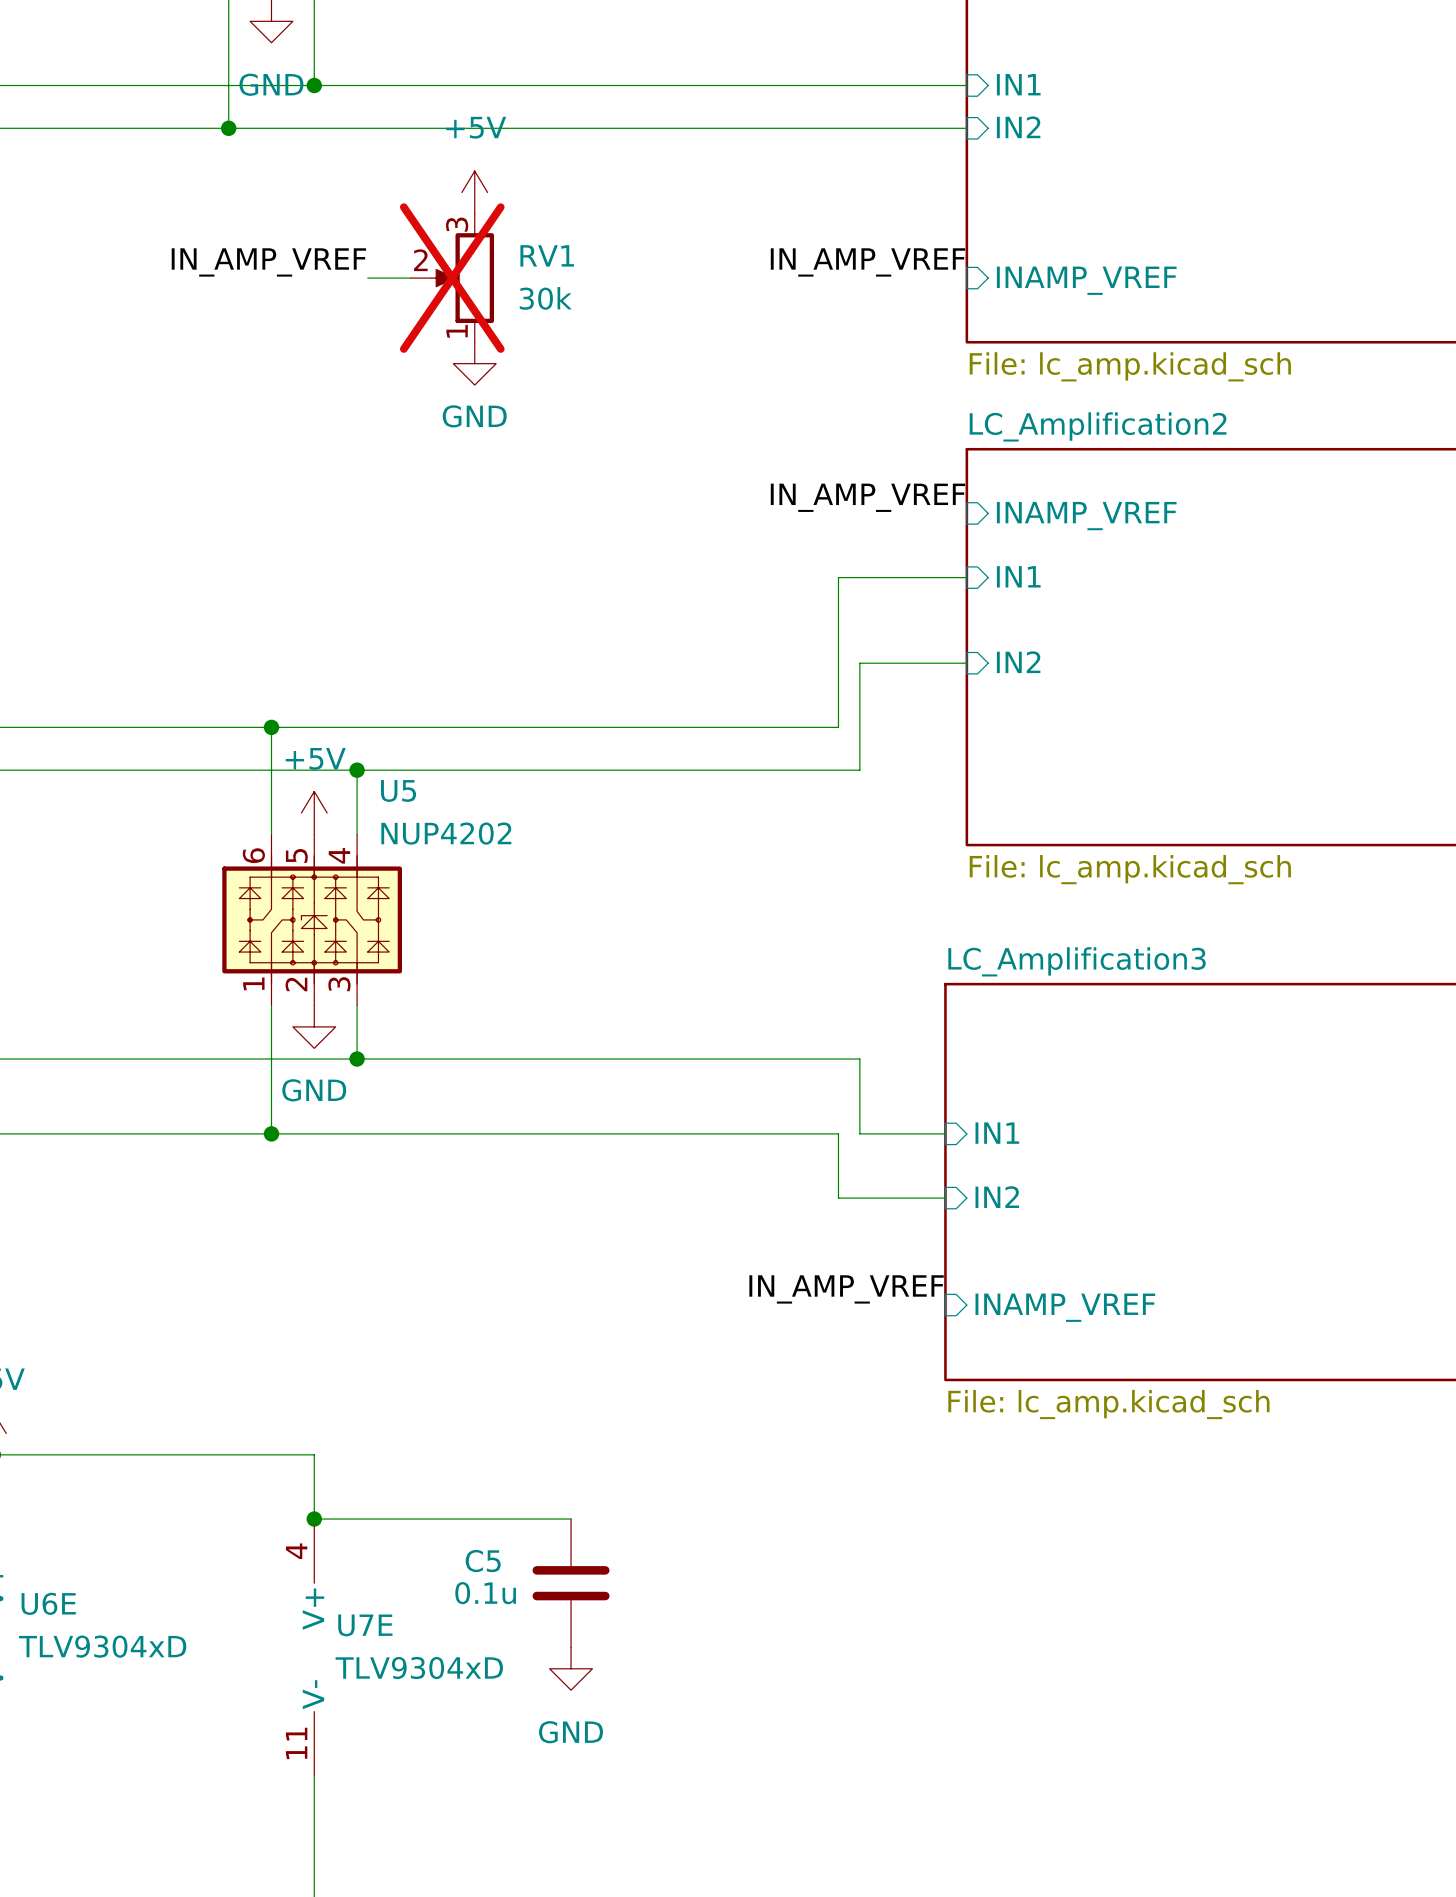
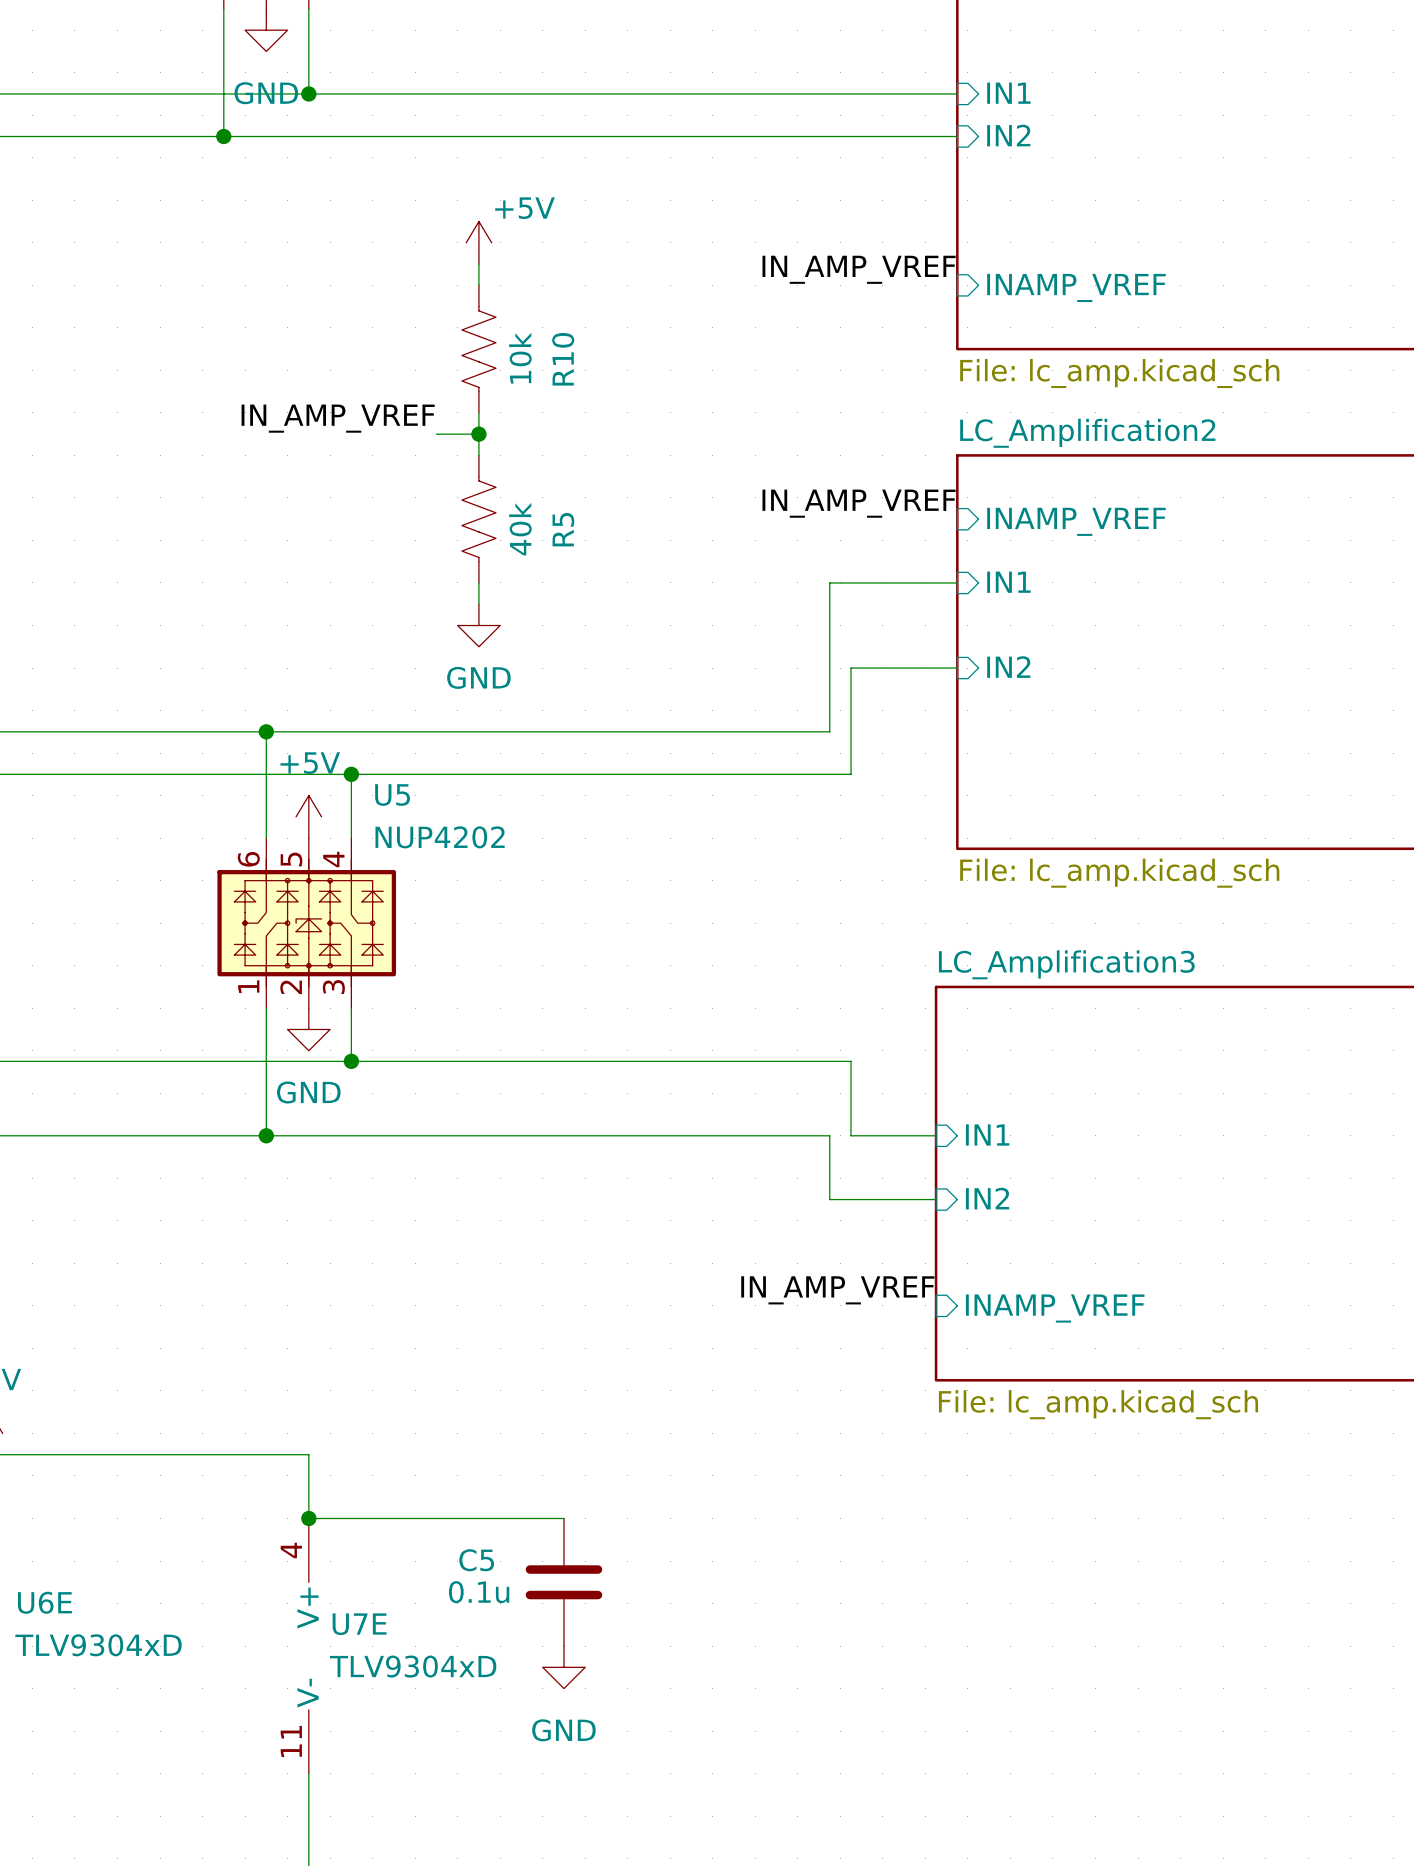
power symbol text position: +5V (476, 127) -> +5V (525, 208)
power symbol position: +5V (474, 192) -> +5V (478, 242)
wire: none -> (478, 264) (478, 285)
label position: IN_AMP_VREF (268, 262) -> IN_AMP_VREF (338, 418)
wire: (367, 278) (410, 278) -> (436, 434) (478, 434)
RV1: 30k (452, 278) -> none
R10: none -> 10k (478, 349)
power symbol position: GND (474, 363) -> GND (478, 625)
wire: none -> (478, 412) (478, 455)
junction: none -> (478, 434)
R5: none -> 40k (478, 519)
wire: none -> (478, 582) (478, 604)

